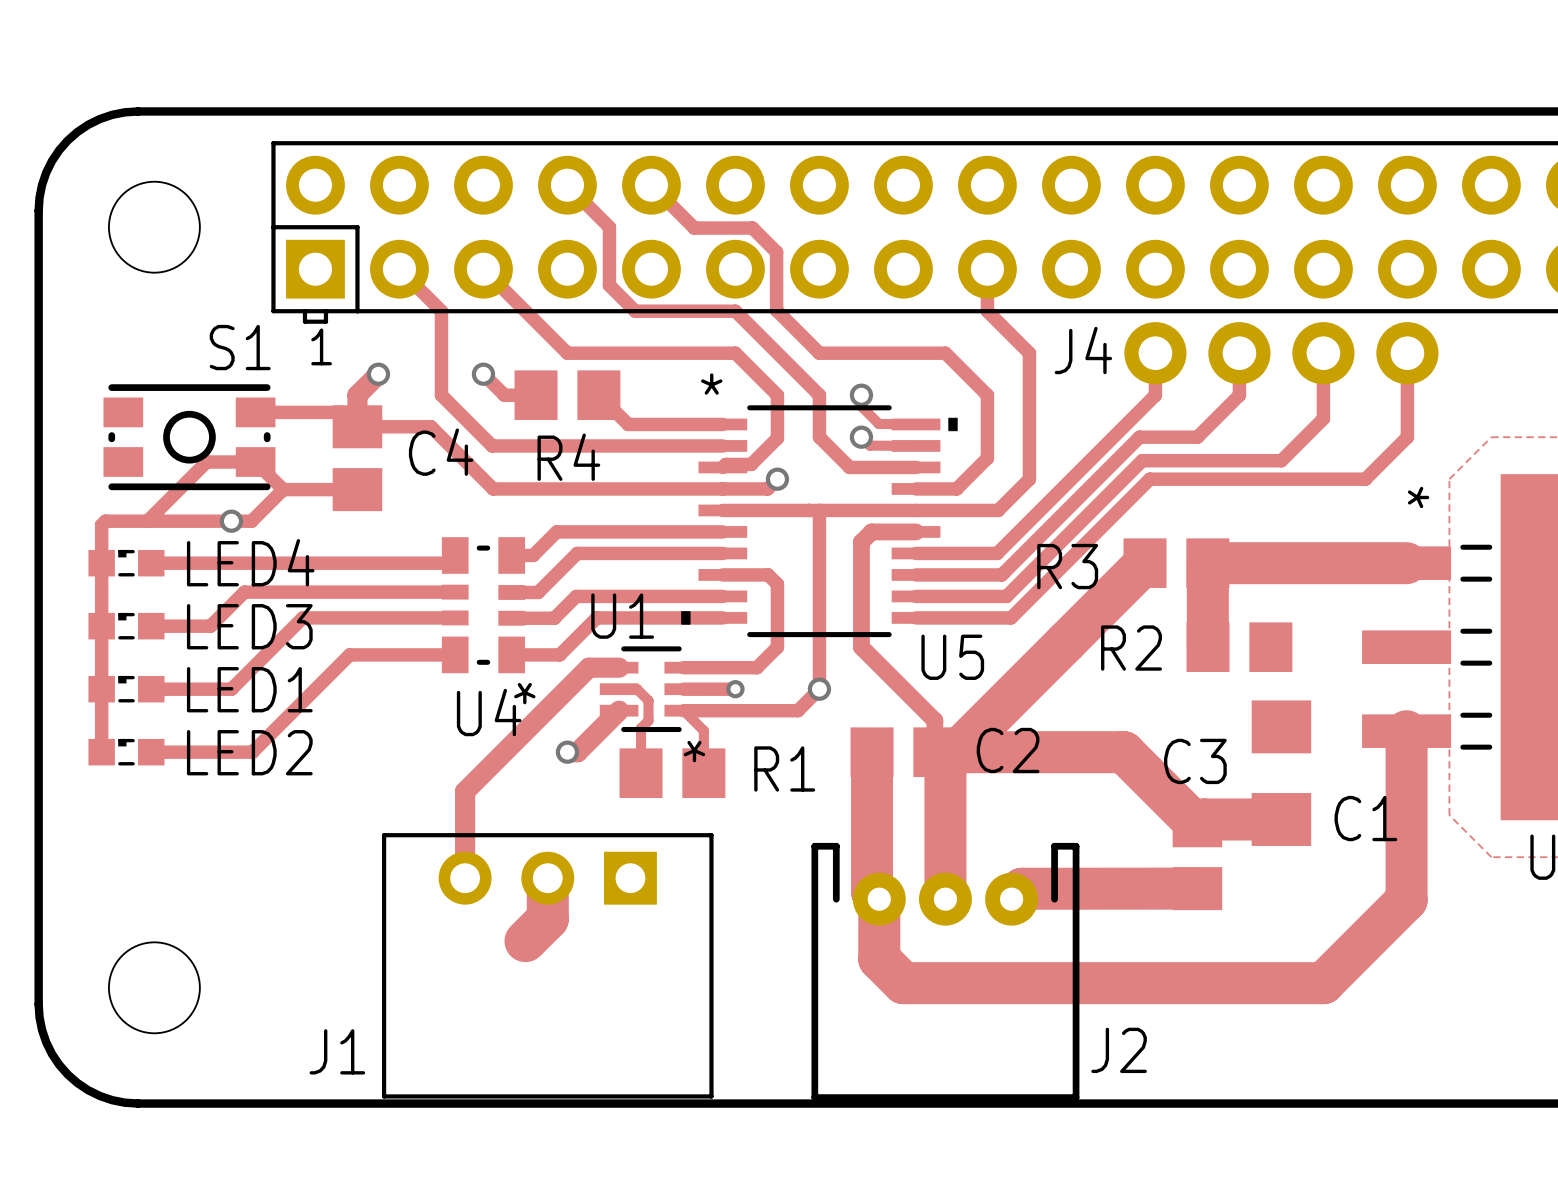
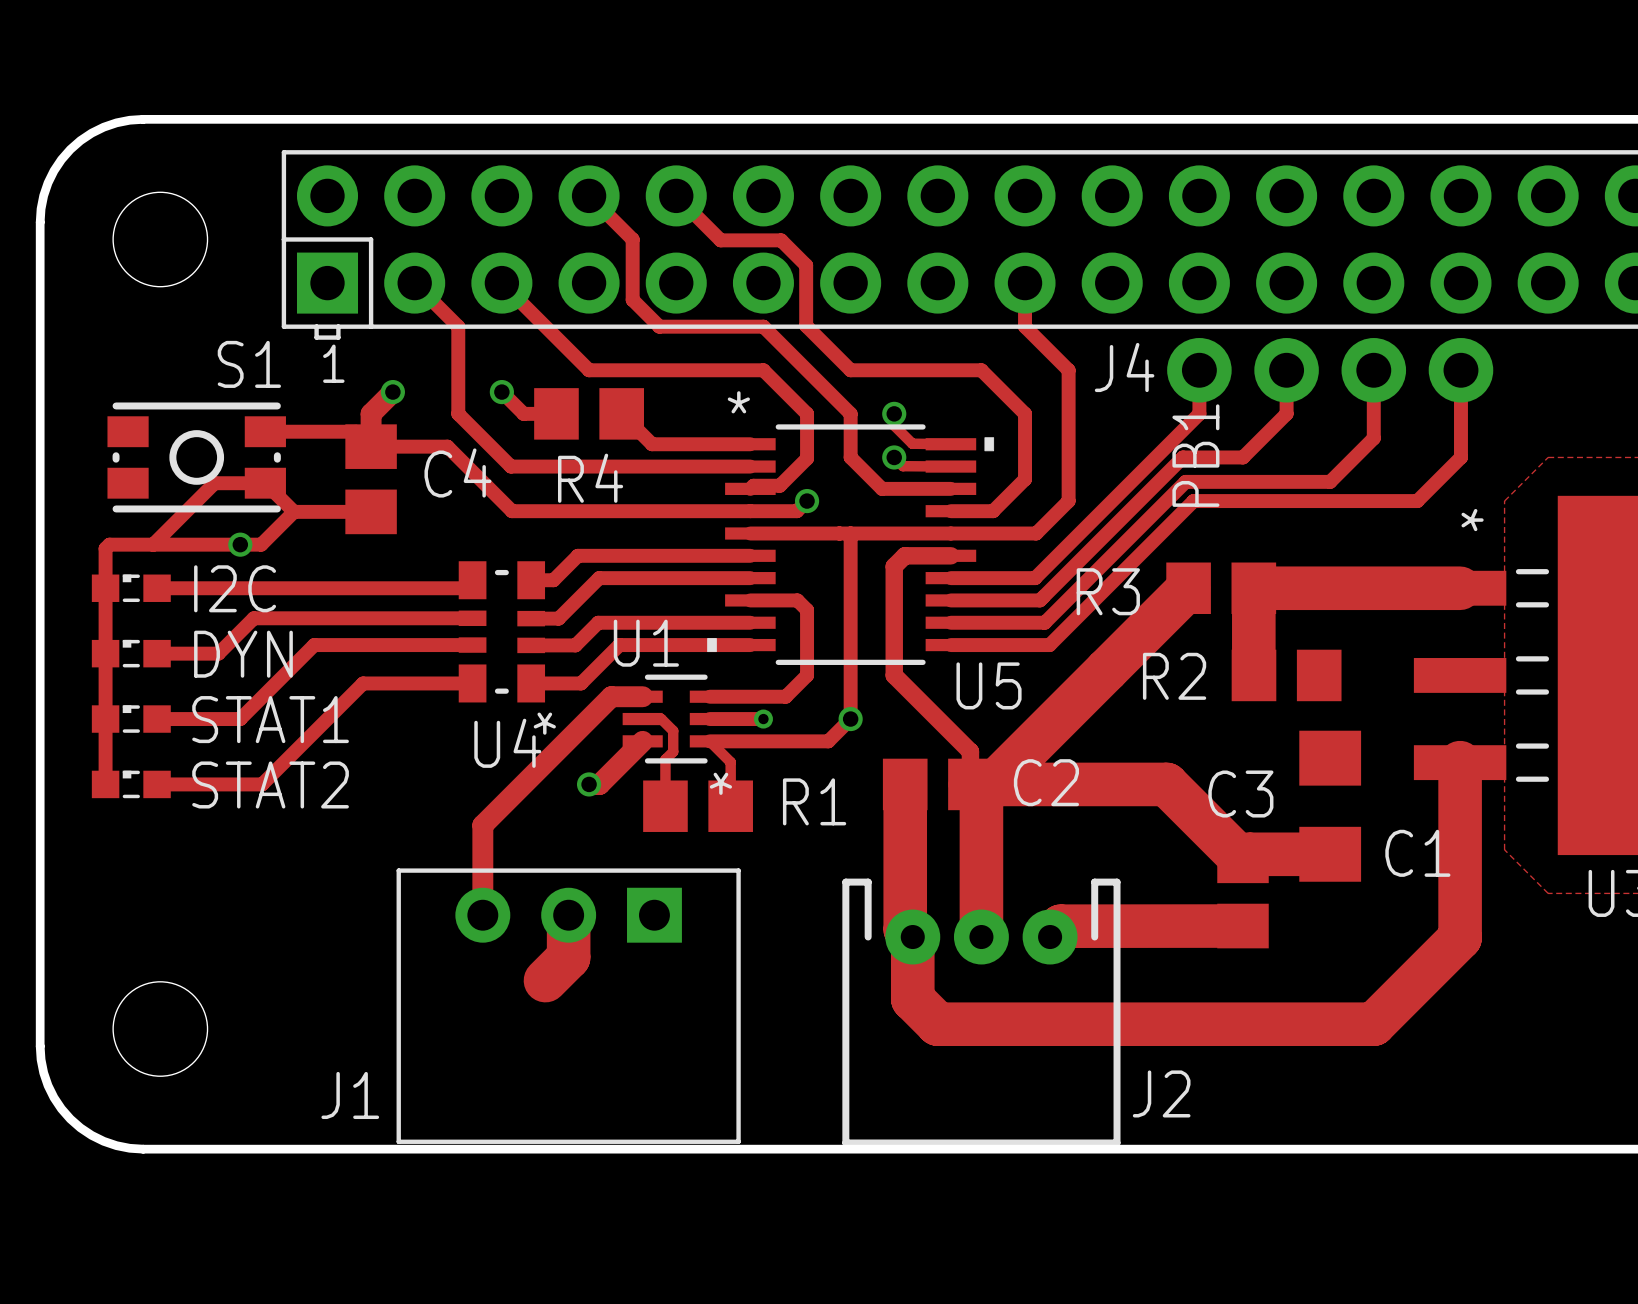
text: none -> PB1 (1195, 455)
LED4 name: LED4 (250, 562) -> I2C (235, 588)
LED3 name: LED3 (249, 626) -> DYN (243, 654)
LED1 name: LED1 (249, 689) -> STAT1 (270, 719)
LED2 name: LED2 (249, 752) -> STAT2 (270, 784)

